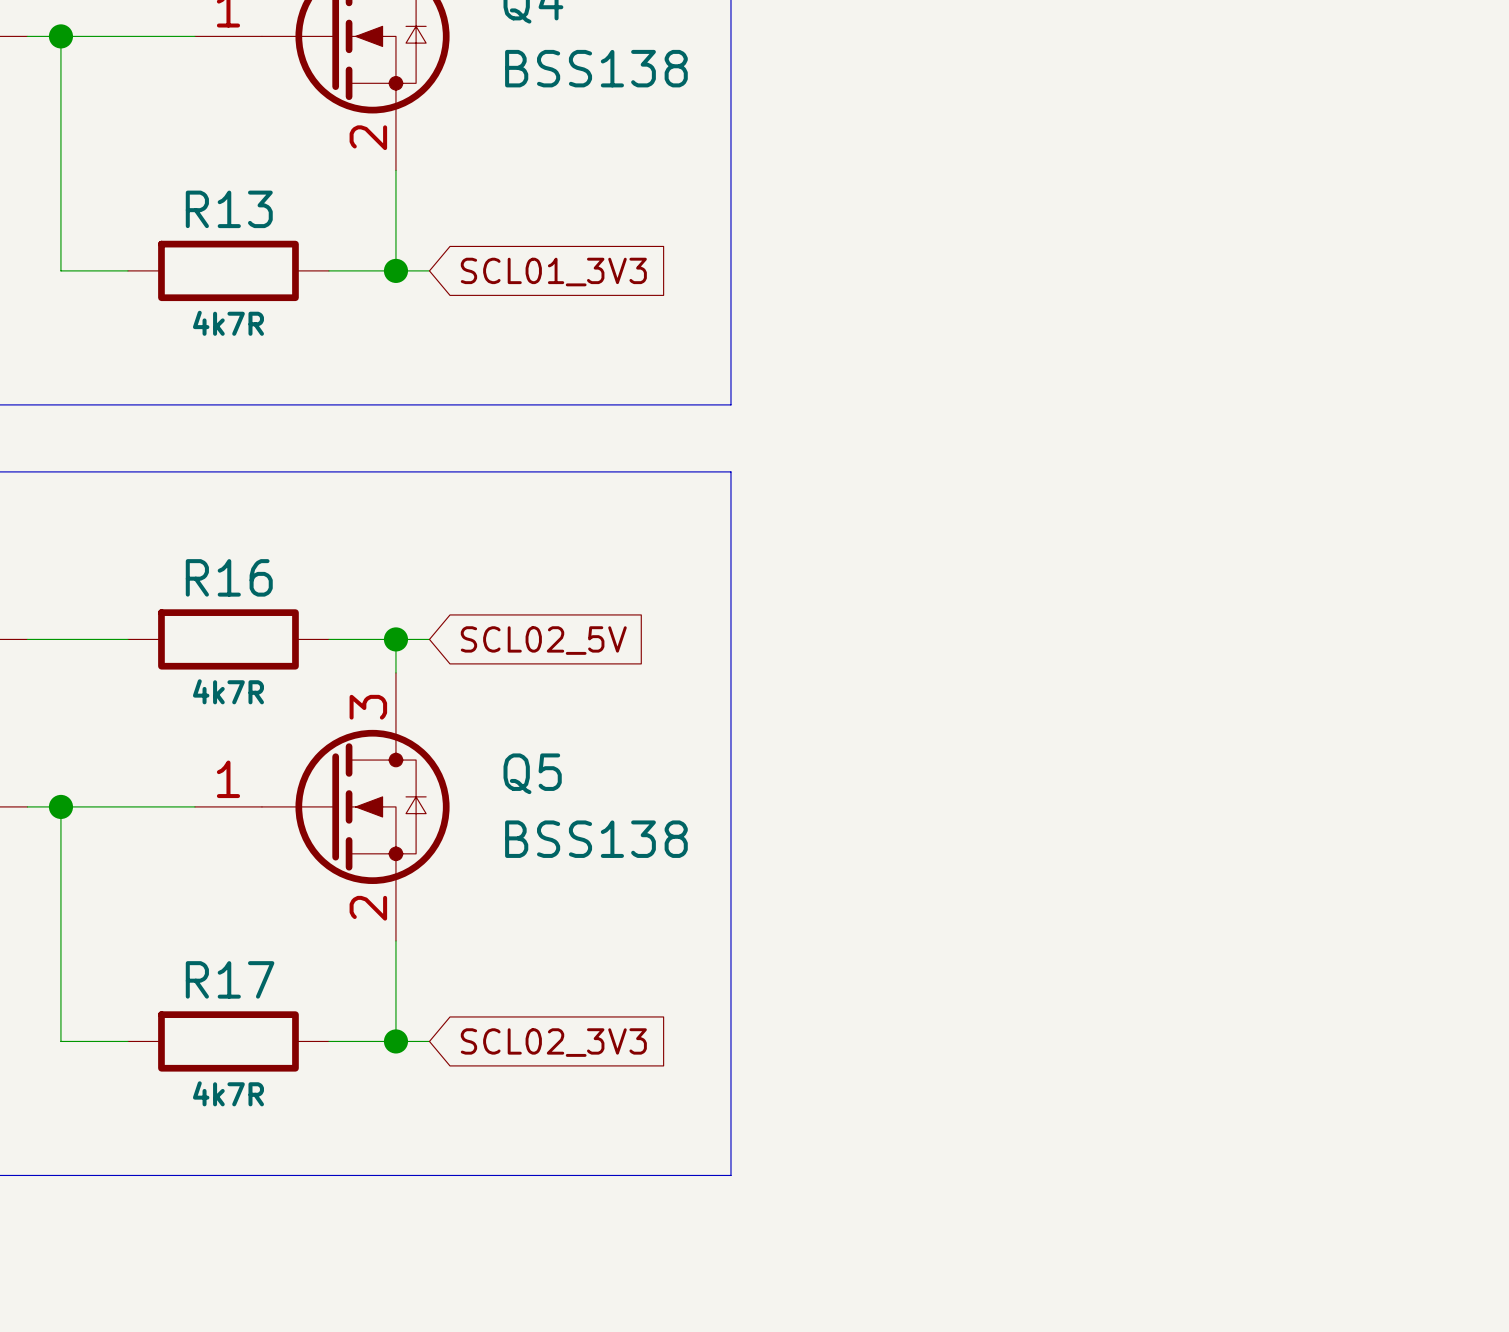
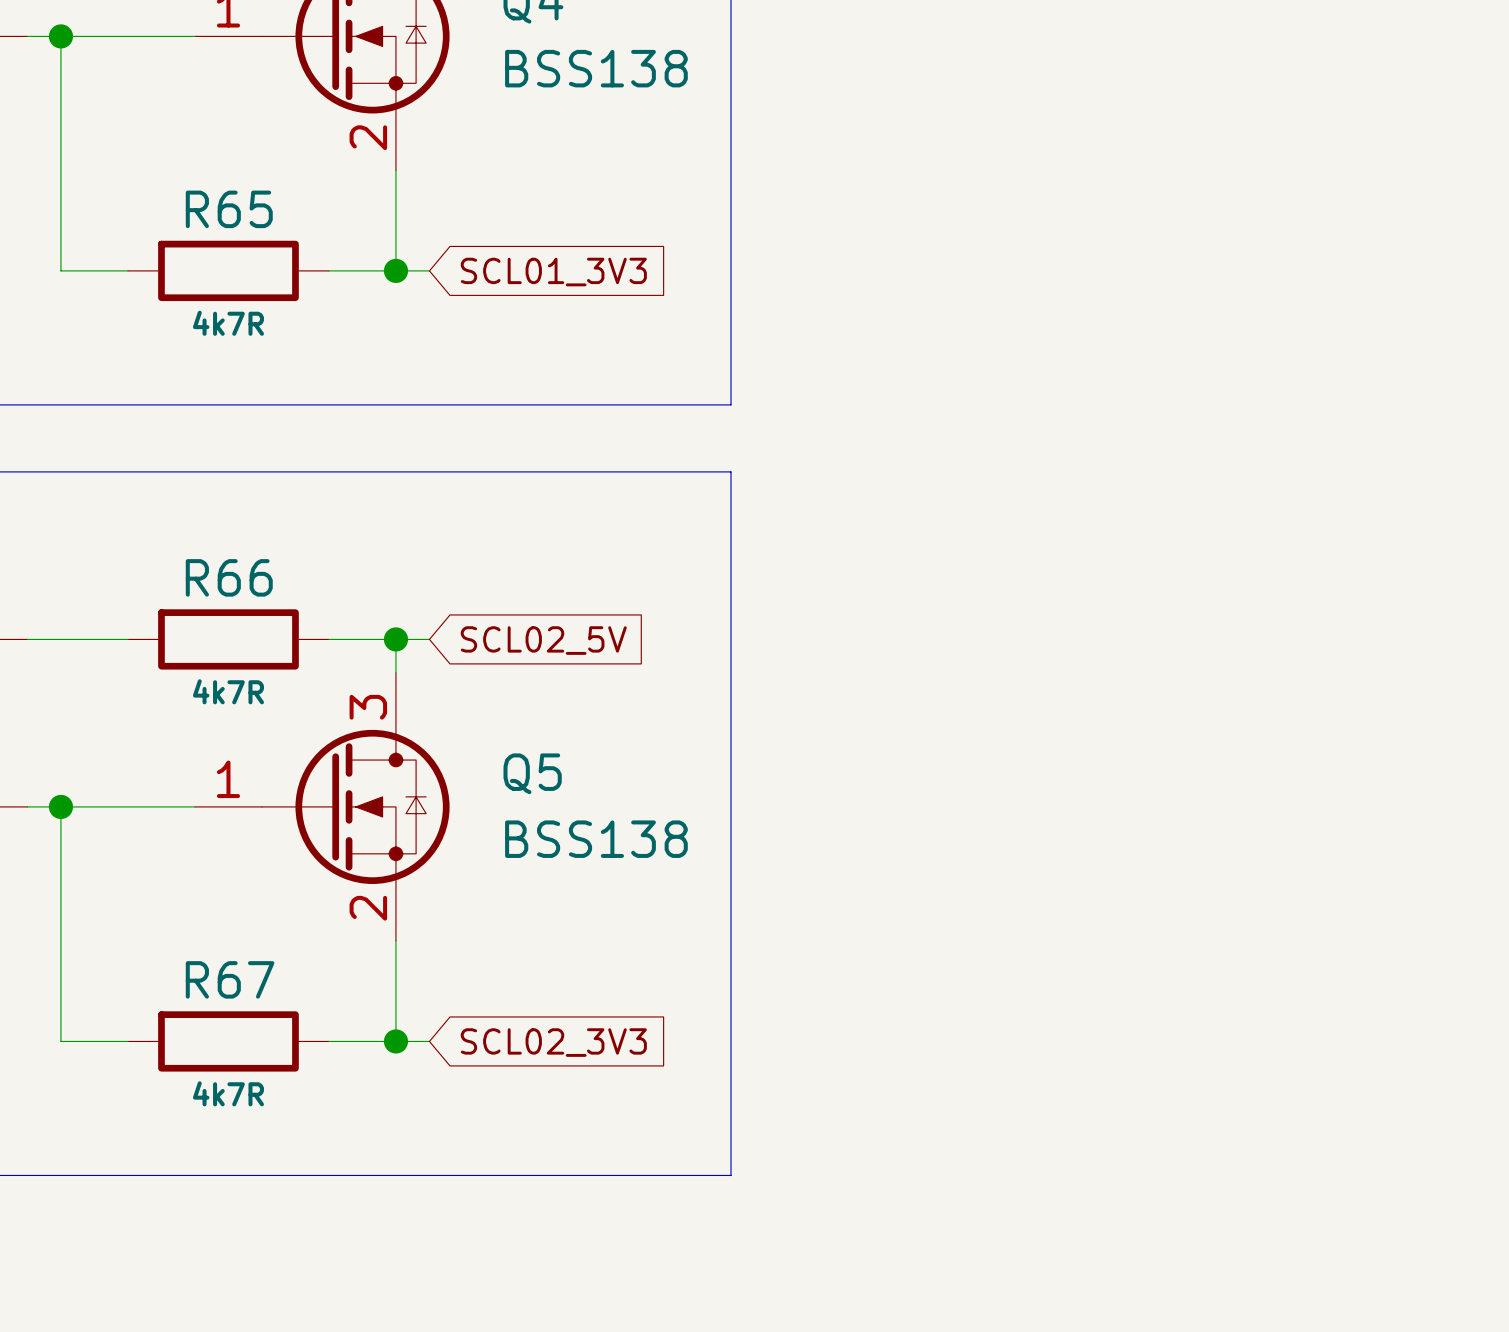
R13 name: R13 (229, 209) -> R65 (229, 209)
R16 name: R16 (229, 577) -> R66 (229, 577)
R17 name: R17 (230, 979) -> R67 (230, 979)

